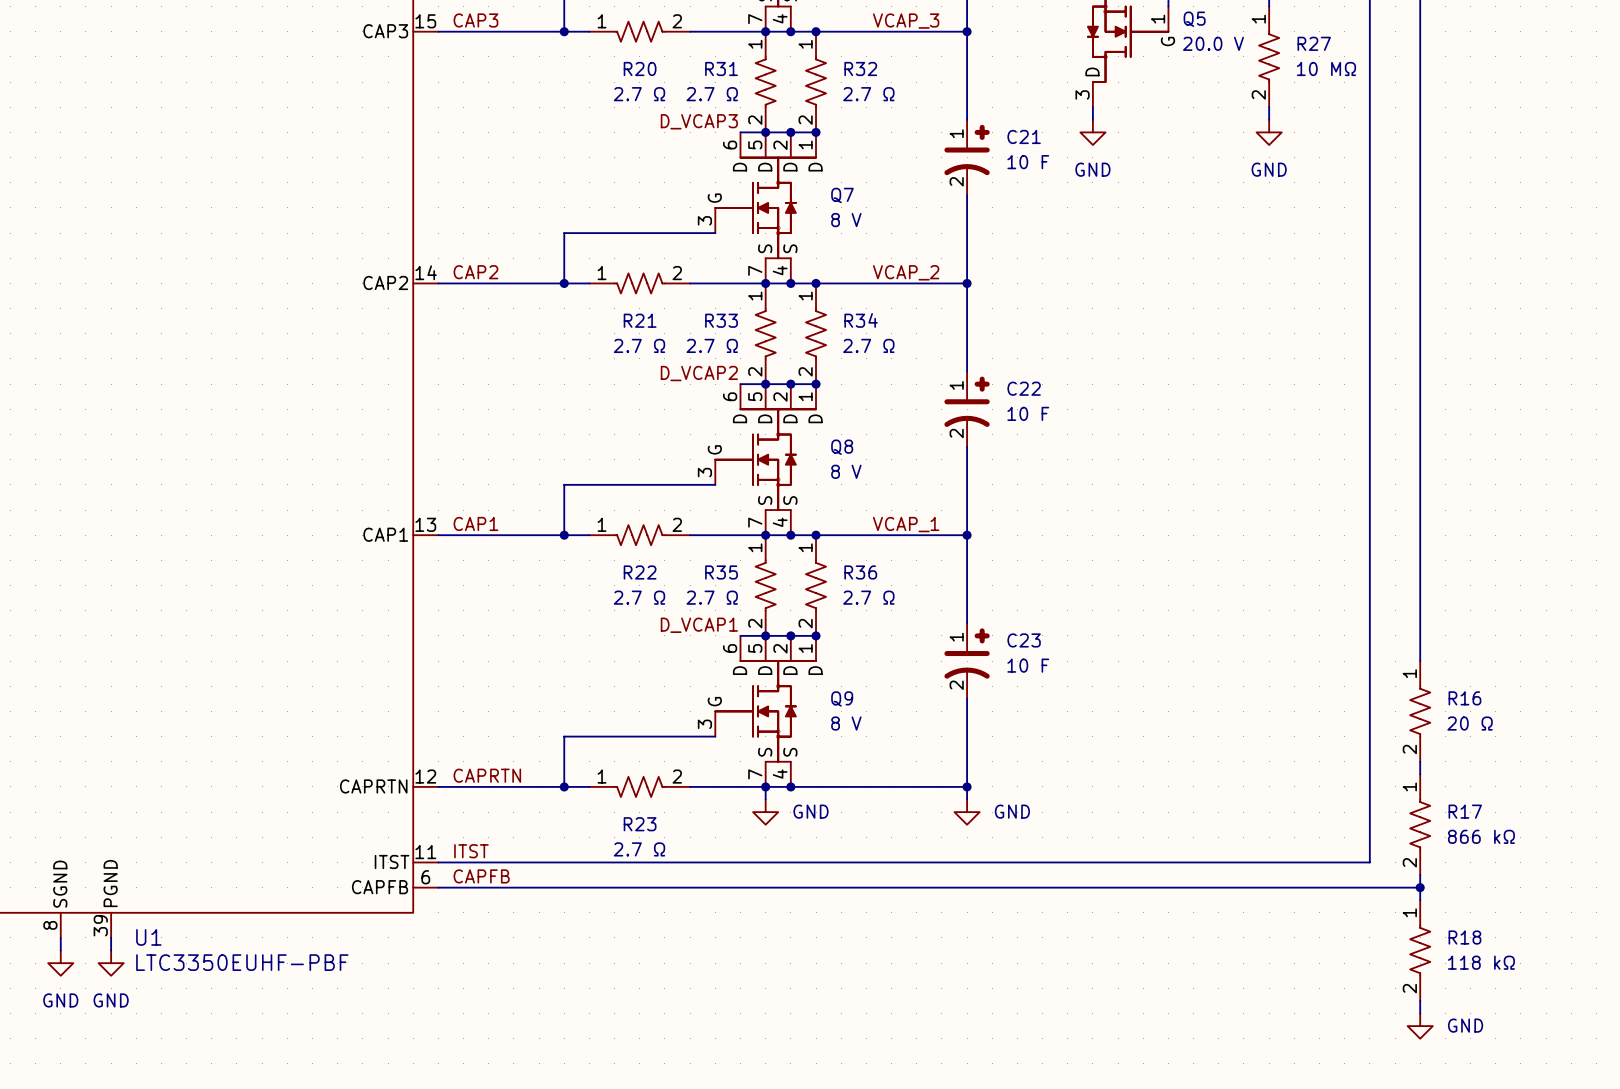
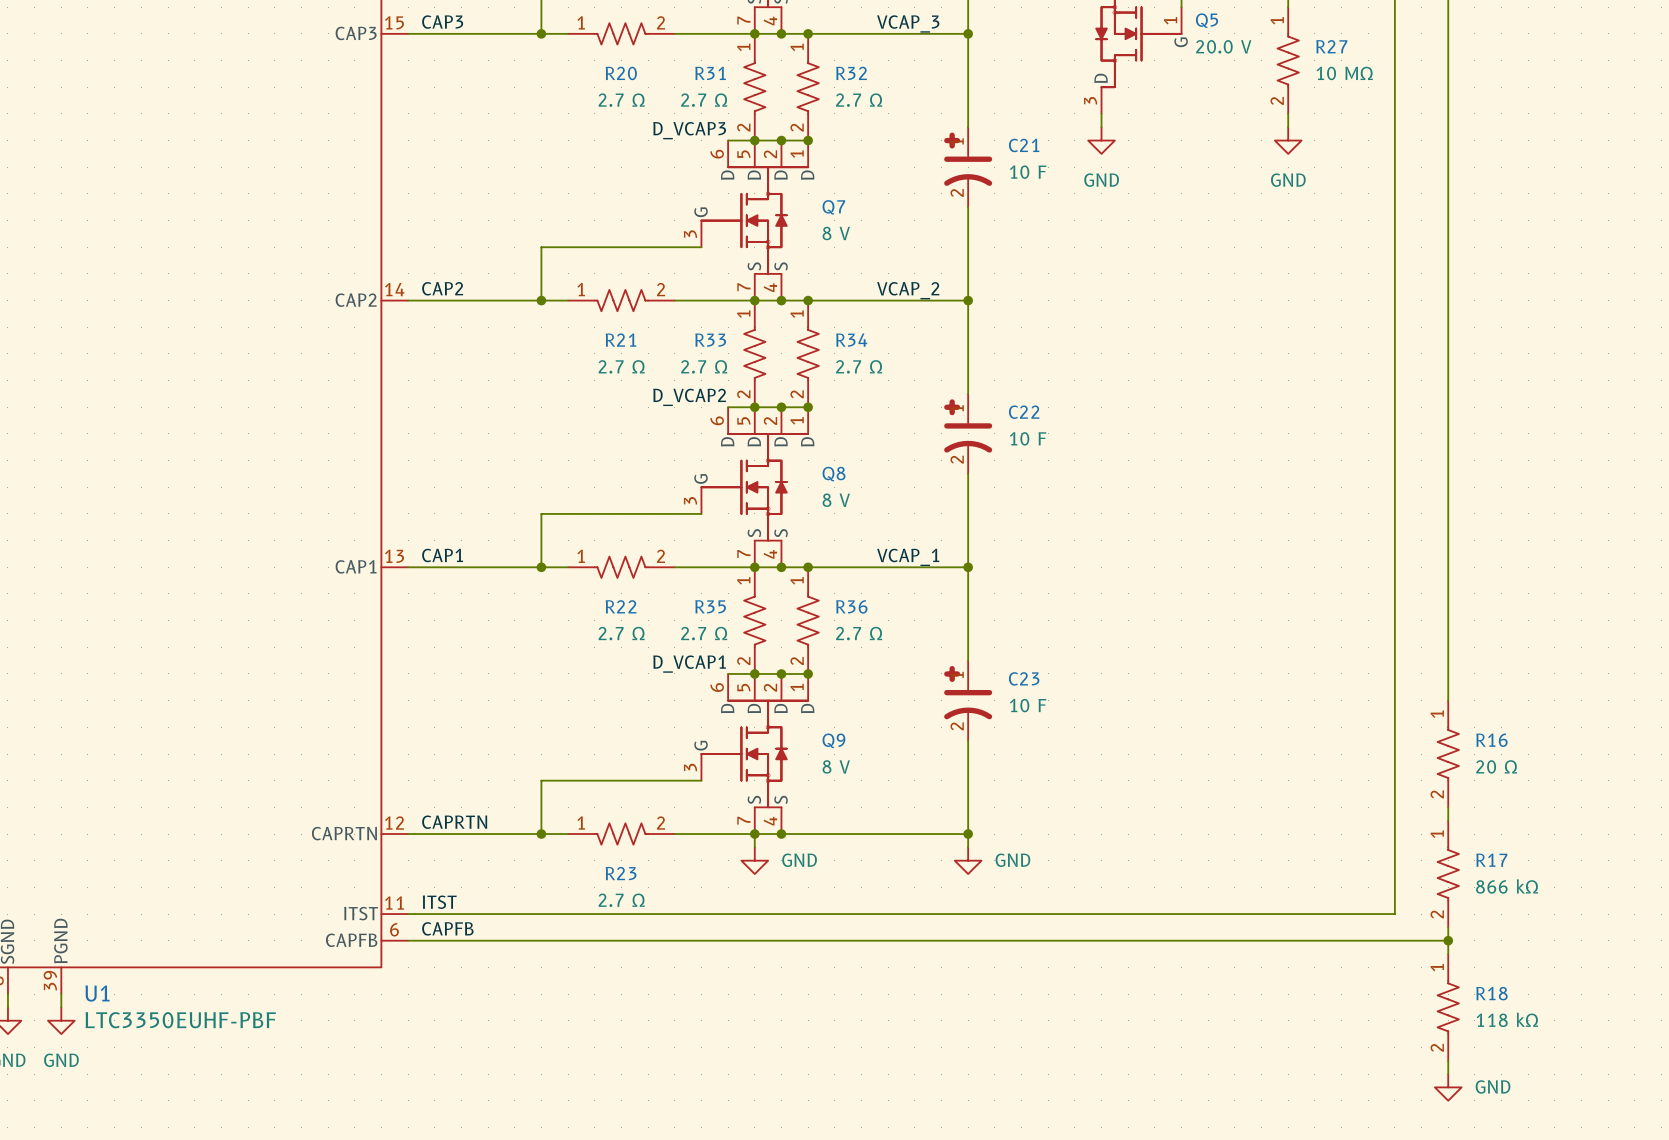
C21 flip: as is (967, 150) -> left-right (968, 159)
C22 flip: as is (967, 401) -> left-right (968, 425)
C23 flip: as is (967, 653) -> left-right (968, 692)

